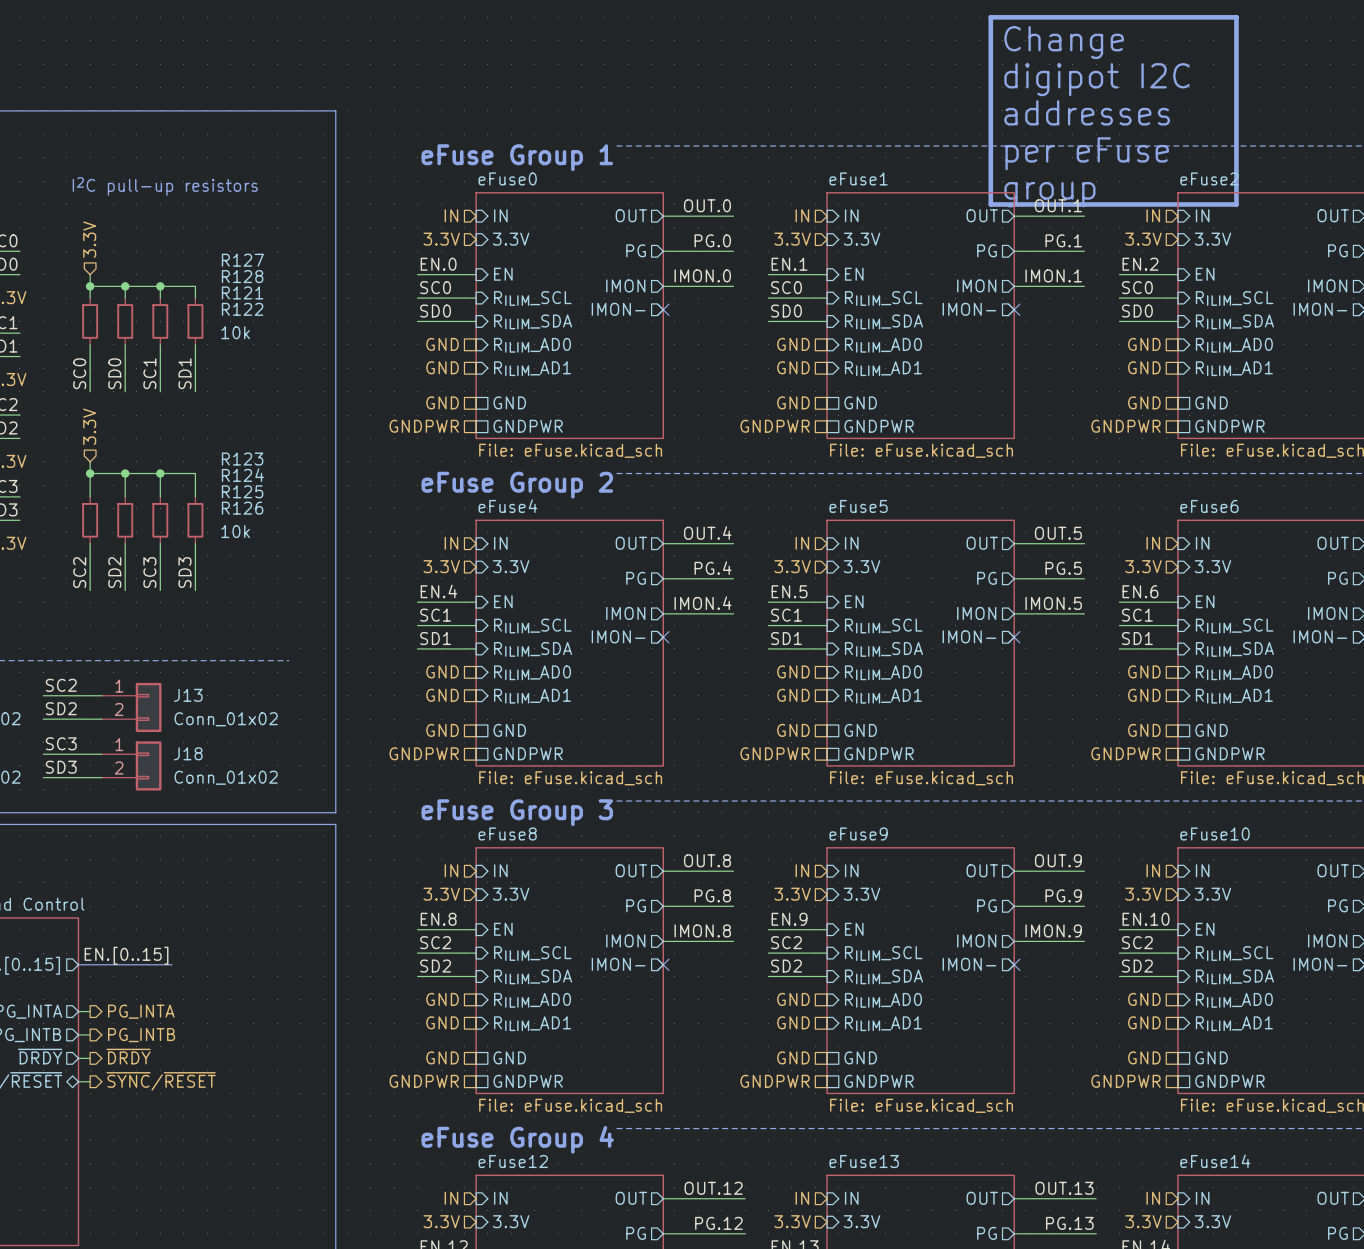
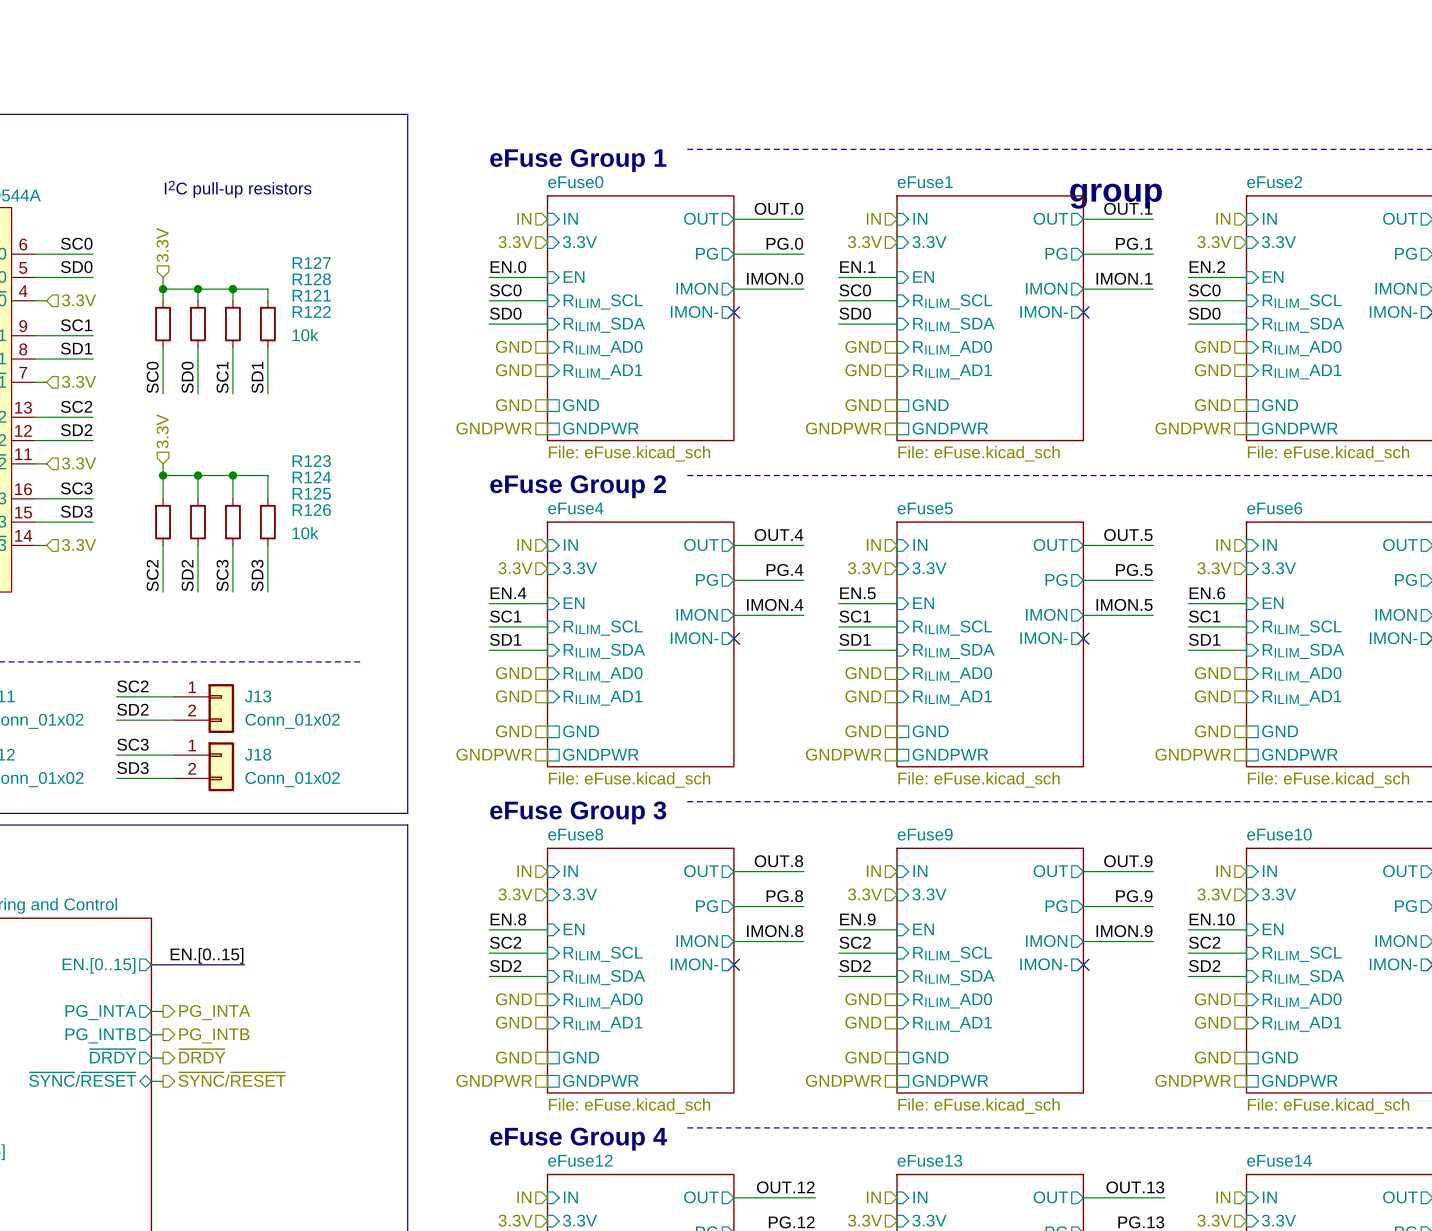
line: (990, 17) (1236, 17) (1236, 204) (990, 204) (990, 17) -> none
text: Change (1064, 42) -> none
text: digipot I2C (1097, 79) -> none
text: addresses (1087, 112) -> none
text: per eFuse (1087, 153) -> none

